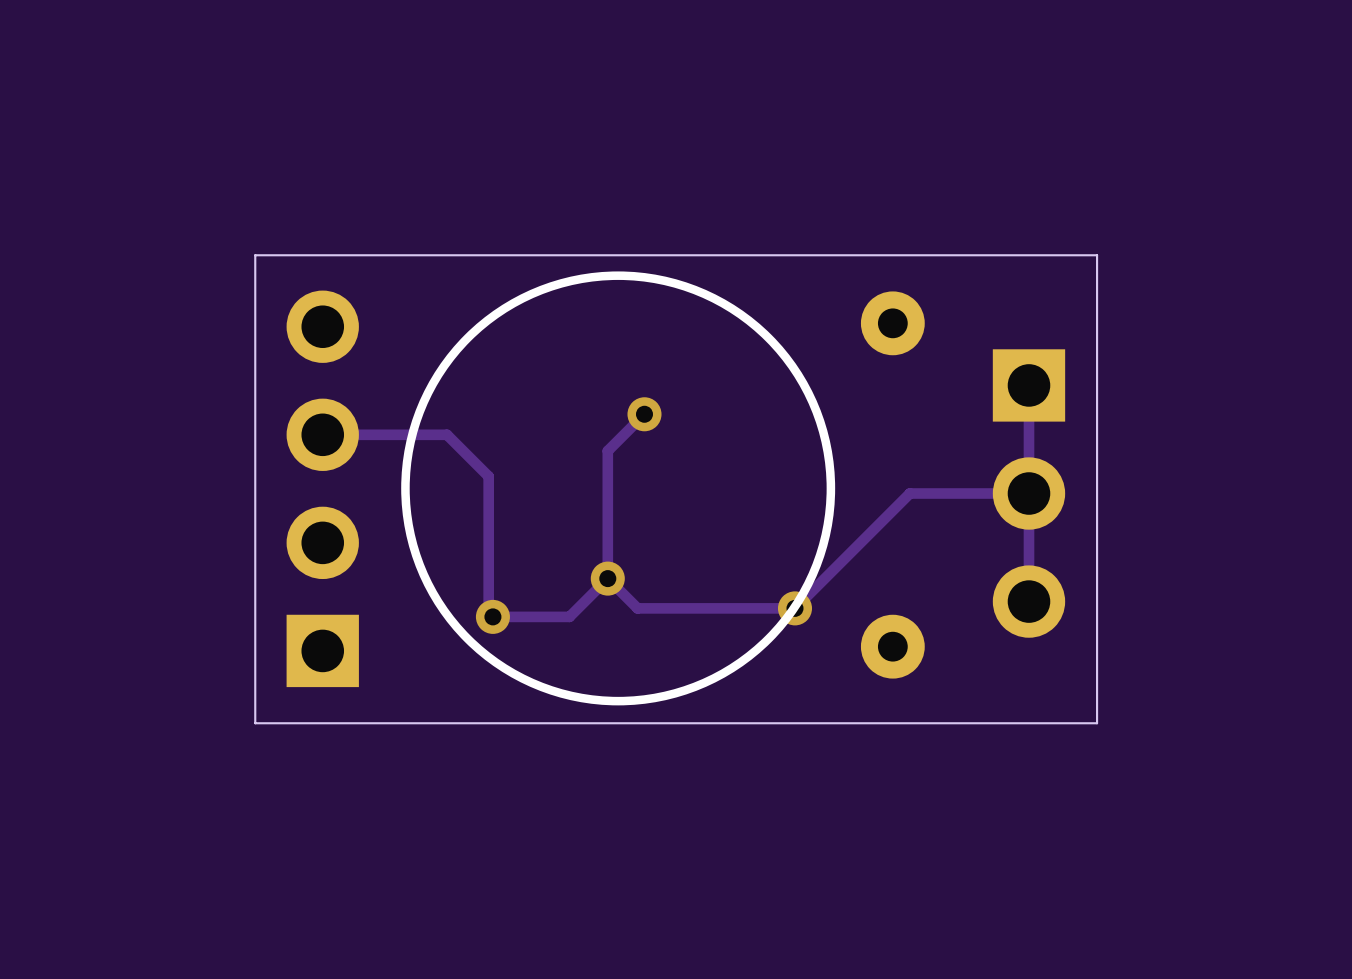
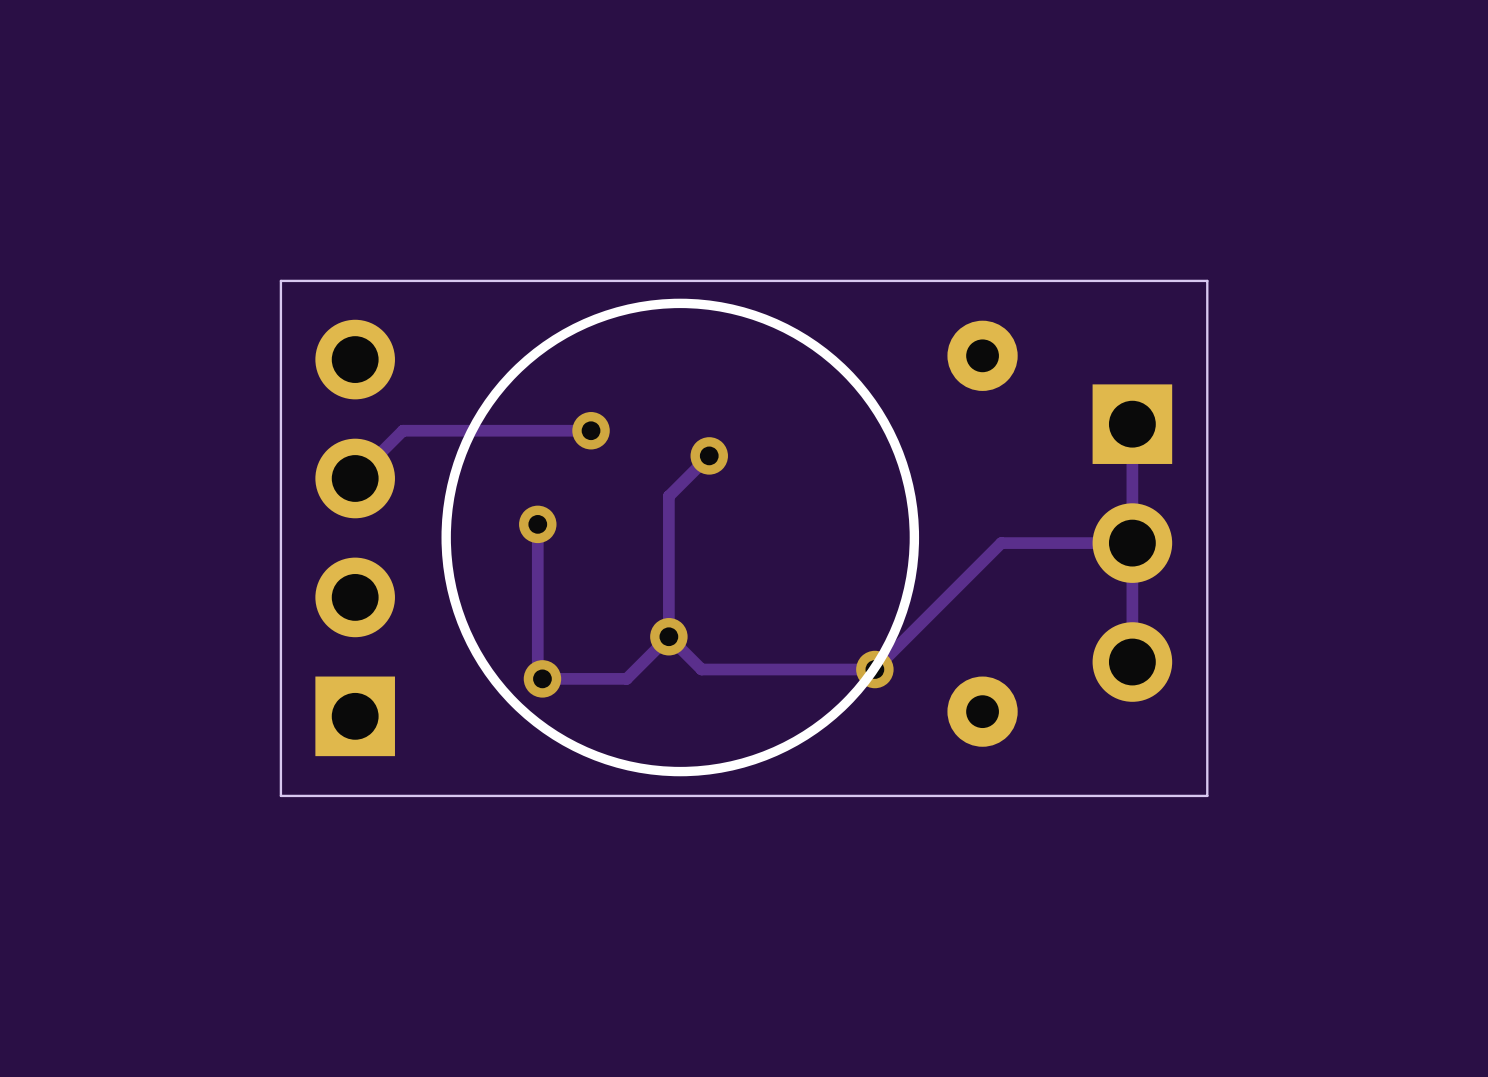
via: none -> (591, 430)
track: (322, 434) (446, 434) (488, 476) -> (355, 478) (402, 430) (591, 430)
via: none -> (537, 524)

